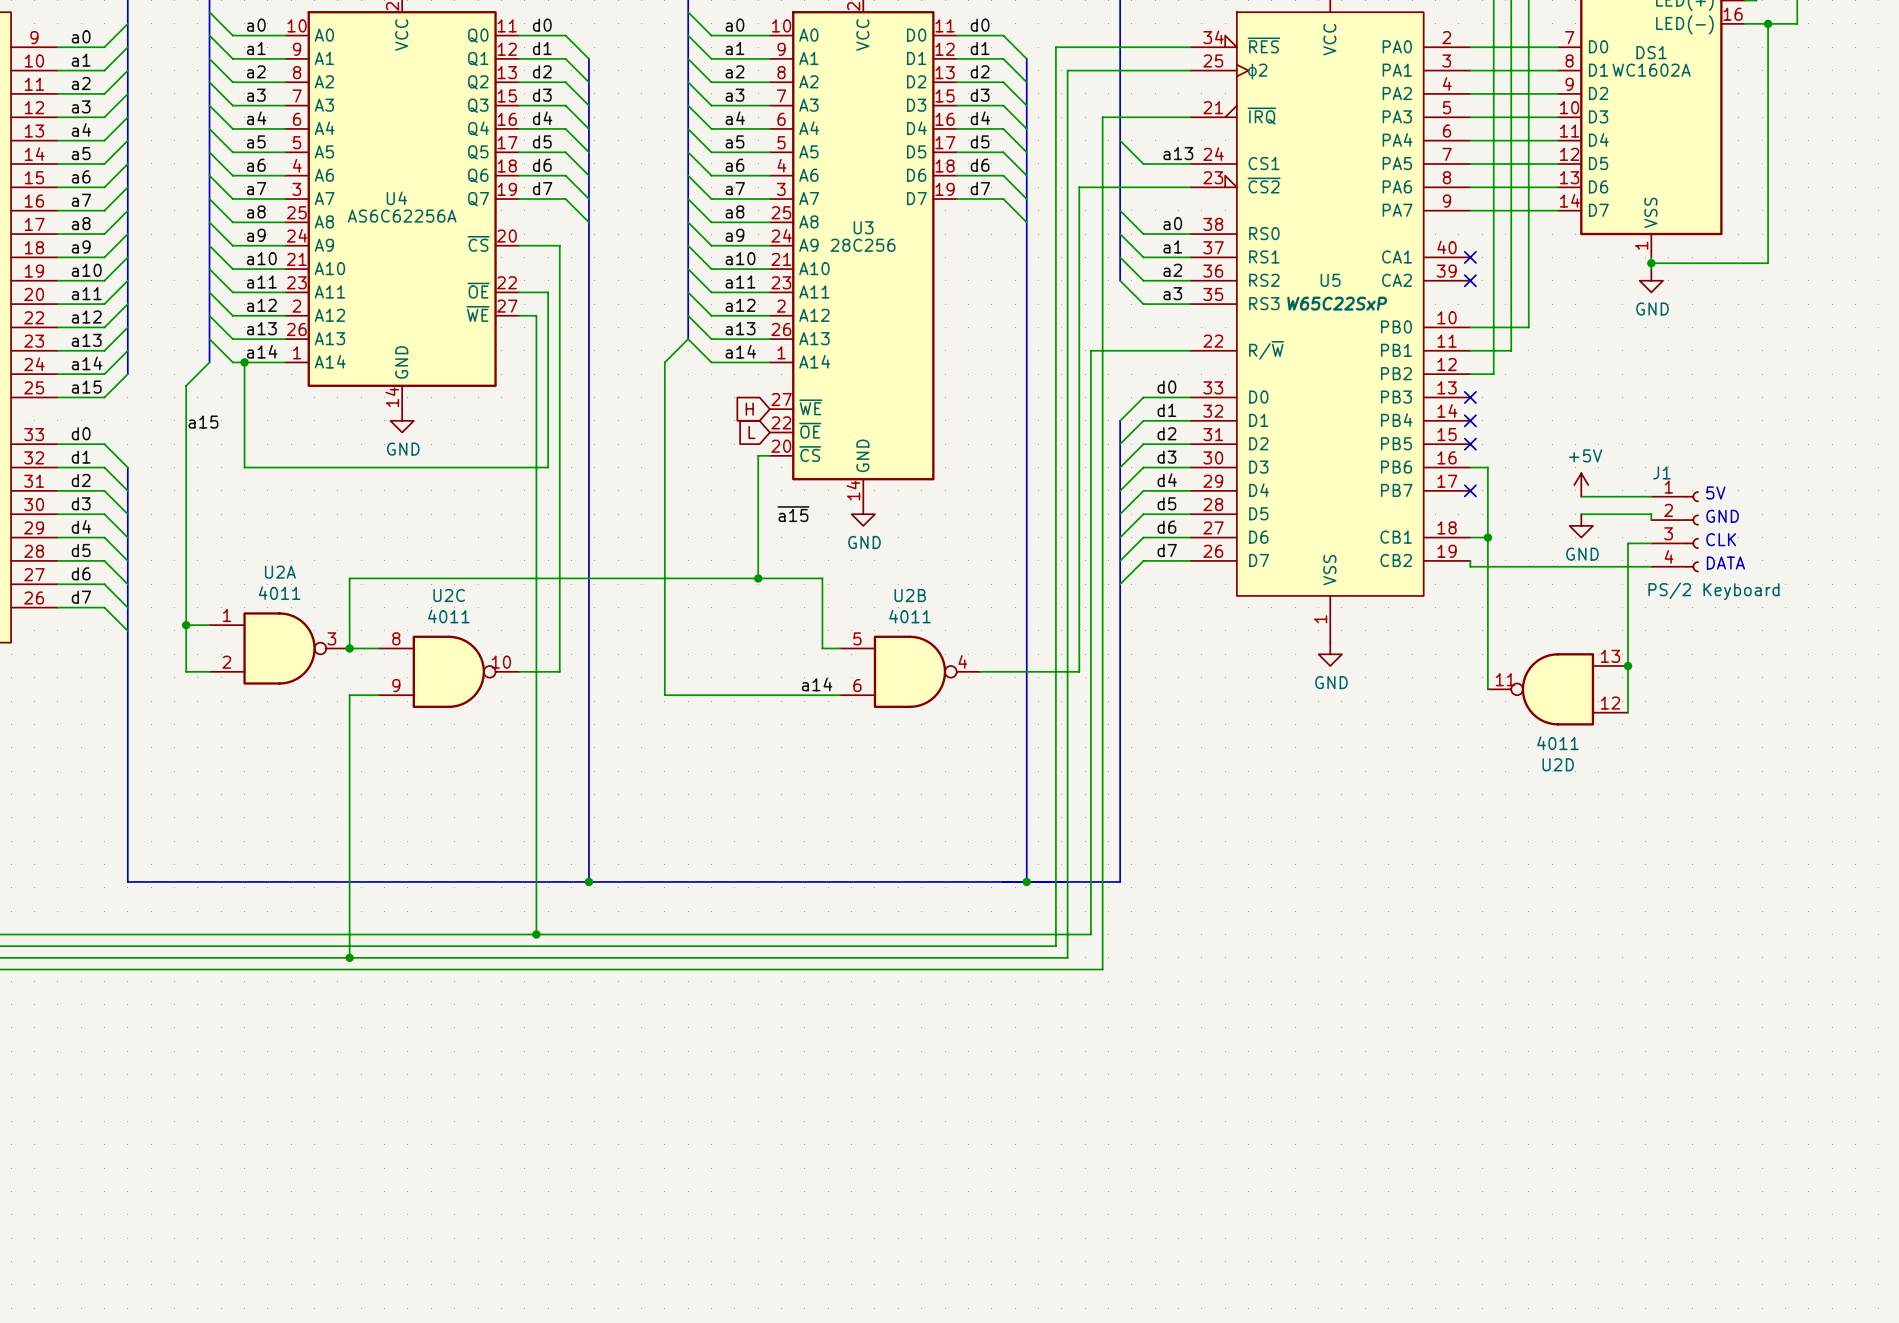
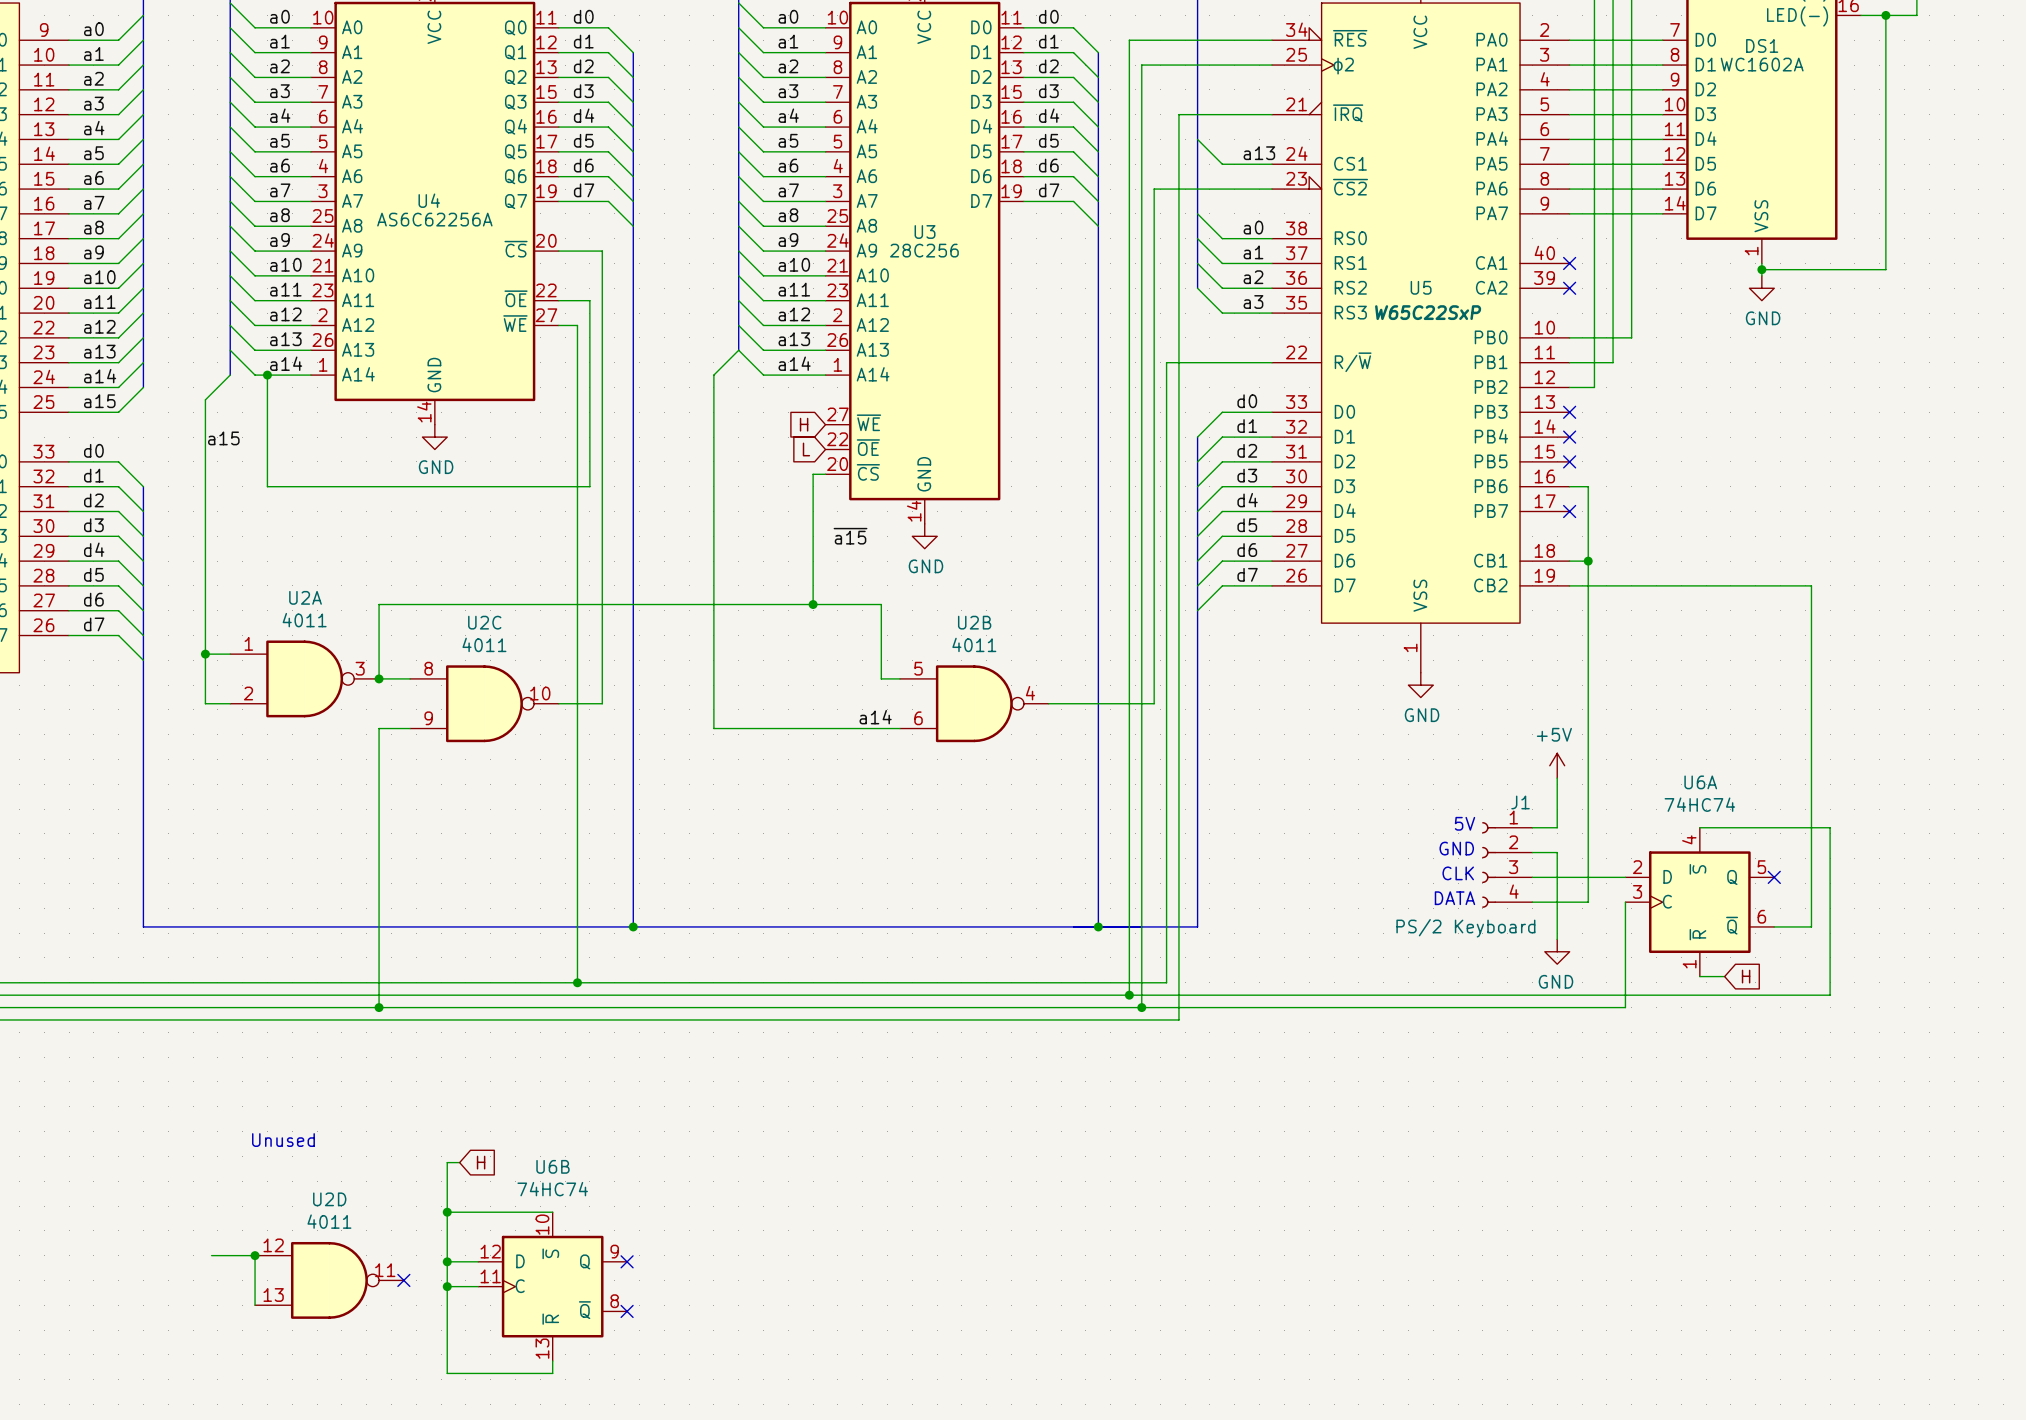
power symbol: +5V (1581, 485) -> none
text: 5V (1715, 492) -> none
wire: (1581, 496) (1651, 496) -> none
wire: (1581, 514) (1651, 514) (1651, 520) -> none
text: GND (1722, 516) -> none
power symbol: GND (1581, 525) -> none
J1 position: (1675, 531) -> (1507, 864)
J1 flip: as is (1692, 531) -> left-right (1489, 864)
text: CLK (1721, 539) -> none
wire: (1651, 543) (1627, 543) (1627, 712) -> none
wire: (1470, 560) (1470, 566) (1651, 566) -> (1569, 585) (1811, 585) (1811, 926) (1774, 926)
text: DATA (1725, 563) -> none
junction: (1627, 665) -> none
wire: none -> (1588, 722) (1588, 902) (1532, 902)
U2D rotation: 0° (1557, 689) -> 180° (329, 1280)
U2D position: (1557, 689) -> (329, 1280)
power symbol: none -> +5V (1557, 765)
wire: none -> (1557, 778) (1557, 827) (1532, 827)
text: none -> 5V (1465, 823)
wire: none -> (1699, 827) (1830, 827) (1830, 995) (1129, 995)
text: none -> GND (1456, 848)
wire: none -> (1532, 852) (1557, 852) (1557, 939)
text: none -> CLK (1458, 873)
wire: none -> (1532, 877) (1625, 877)
no-connect mark: none -> (1774, 877)
text: none -> DATA (1454, 898)
wire: none -> (1625, 902) (1625, 1007) (1141, 1007)
U6A: none -> 74HC74 (1699, 902)
power symbol: none -> GND (1557, 951)
wire: none -> (1699, 976) (1724, 976)
global label: none -> H (1746, 976)
junction: none -> (1129, 995)
junction: none -> (1141, 1007)
text: none -> Unused (283, 1140)
wire: none -> (459, 1162) (447, 1162) (447, 1373) (552, 1373) (552, 1361)
global label: none -> H (481, 1162)
wire: none -> (447, 1212) (552, 1212)
junction: none -> (447, 1212)
wire: none -> (211, 1255) (255, 1255) (255, 1305)
junction: none -> (255, 1255)
wire: none -> (447, 1261) (478, 1261)
junction: none -> (447, 1261)
no-connect mark: none -> (627, 1261)
no-connect mark: none -> (403, 1280)
wire: none -> (447, 1286) (478, 1286)
junction: none -> (447, 1286)
U6B: none -> 74HC74 (552, 1286)
no-connect mark: none -> (627, 1311)

